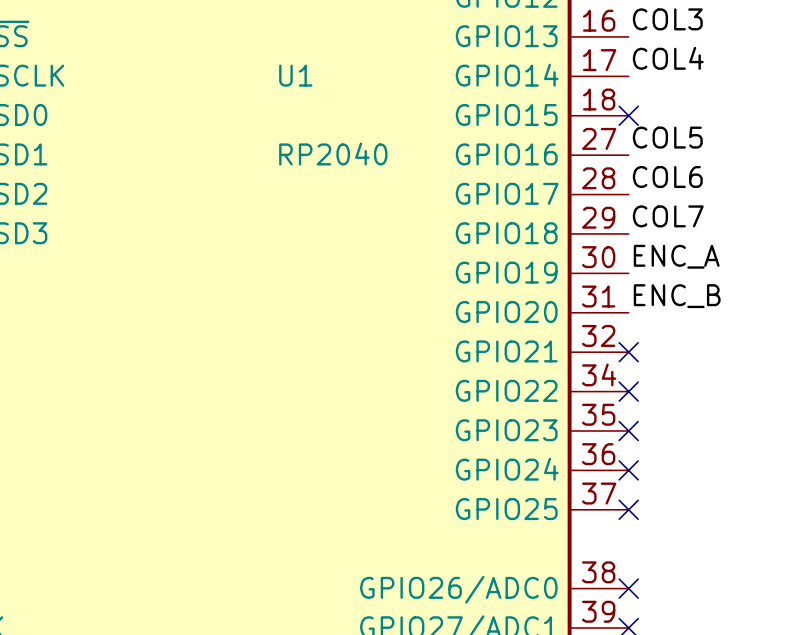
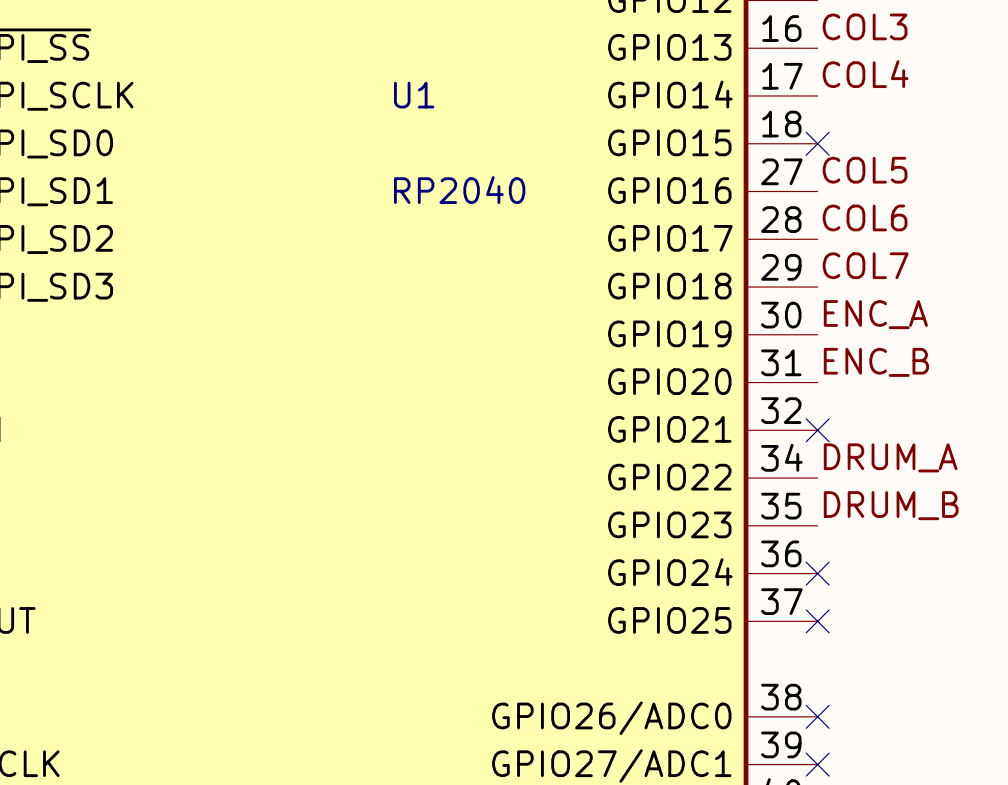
label: none -> DRUM_A (890, 457)
no-connect mark: (628, 391) -> none
label: none -> DRUM_B (891, 505)
no-connect mark: (628, 430) -> none

